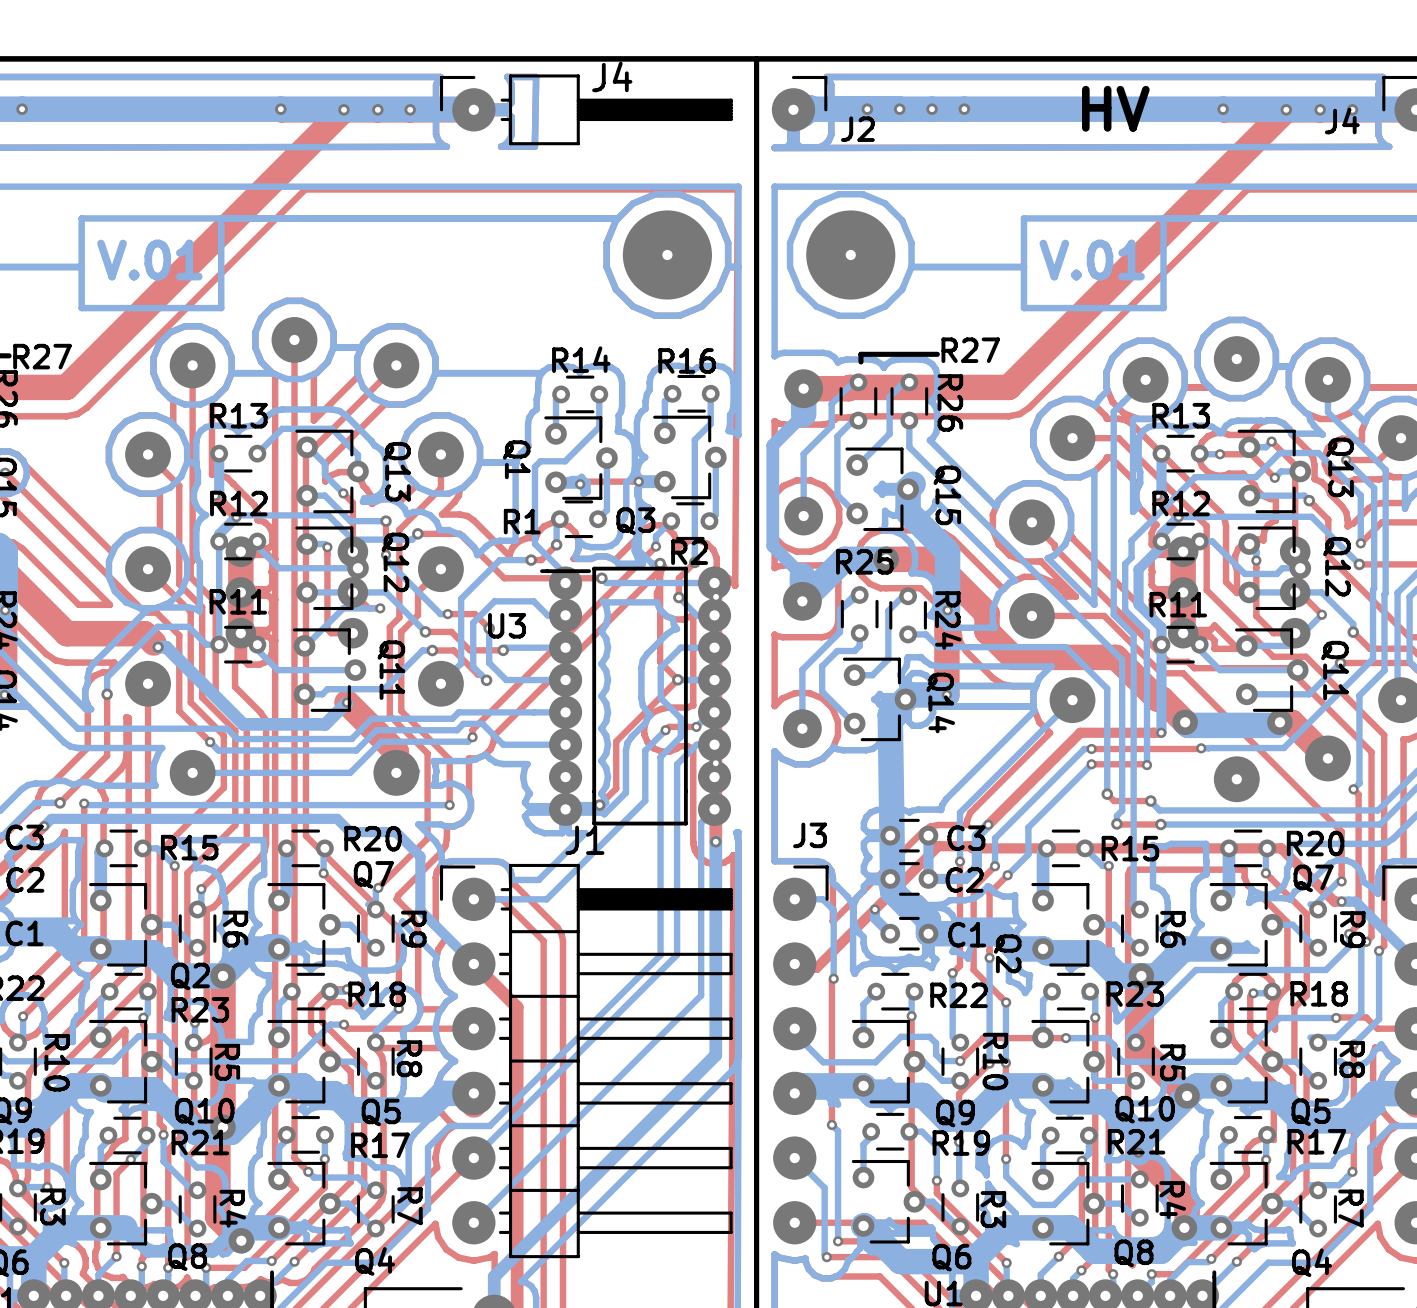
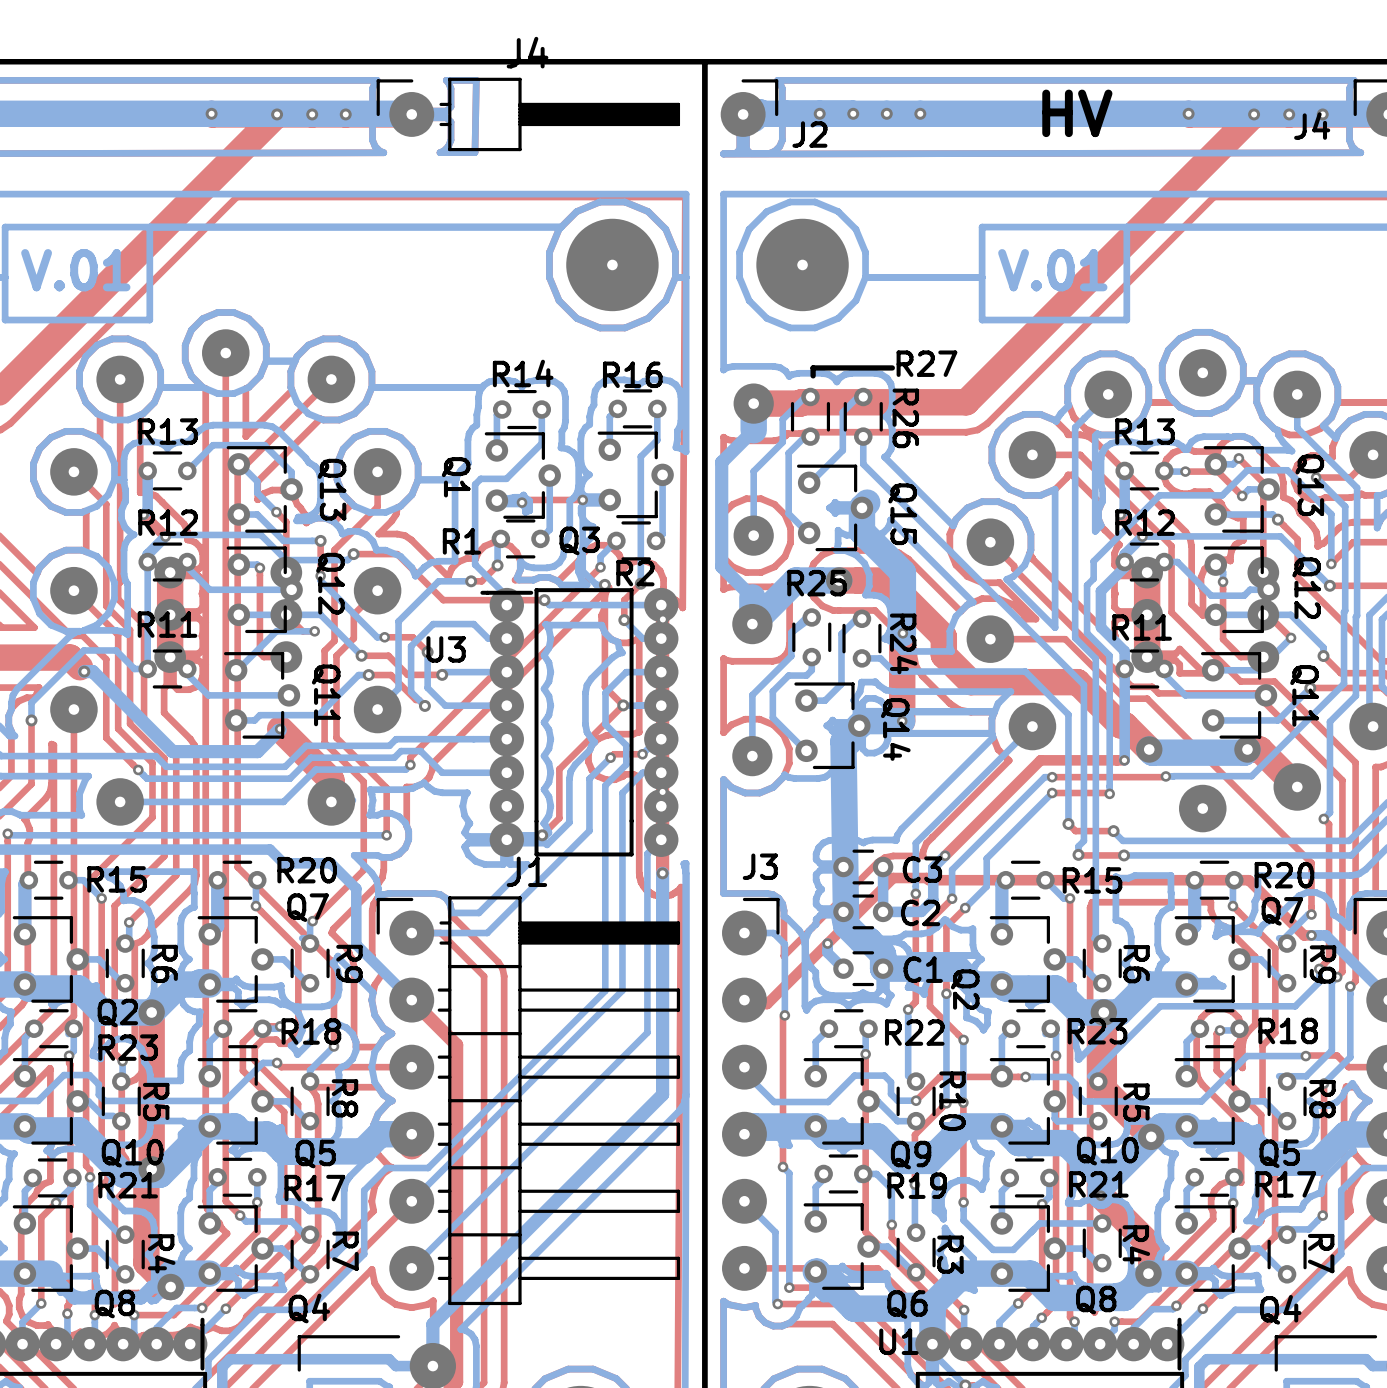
line: (620, 63) (614, 81) (630, 81) -> (536, 38) (530, 57) (546, 57)
line: (603, 64) (602, 86) (594, 90) -> (518, 40) (517, 62) (508, 66)
line: (626, 73) (626, 90) -> (542, 48) (542, 66)

